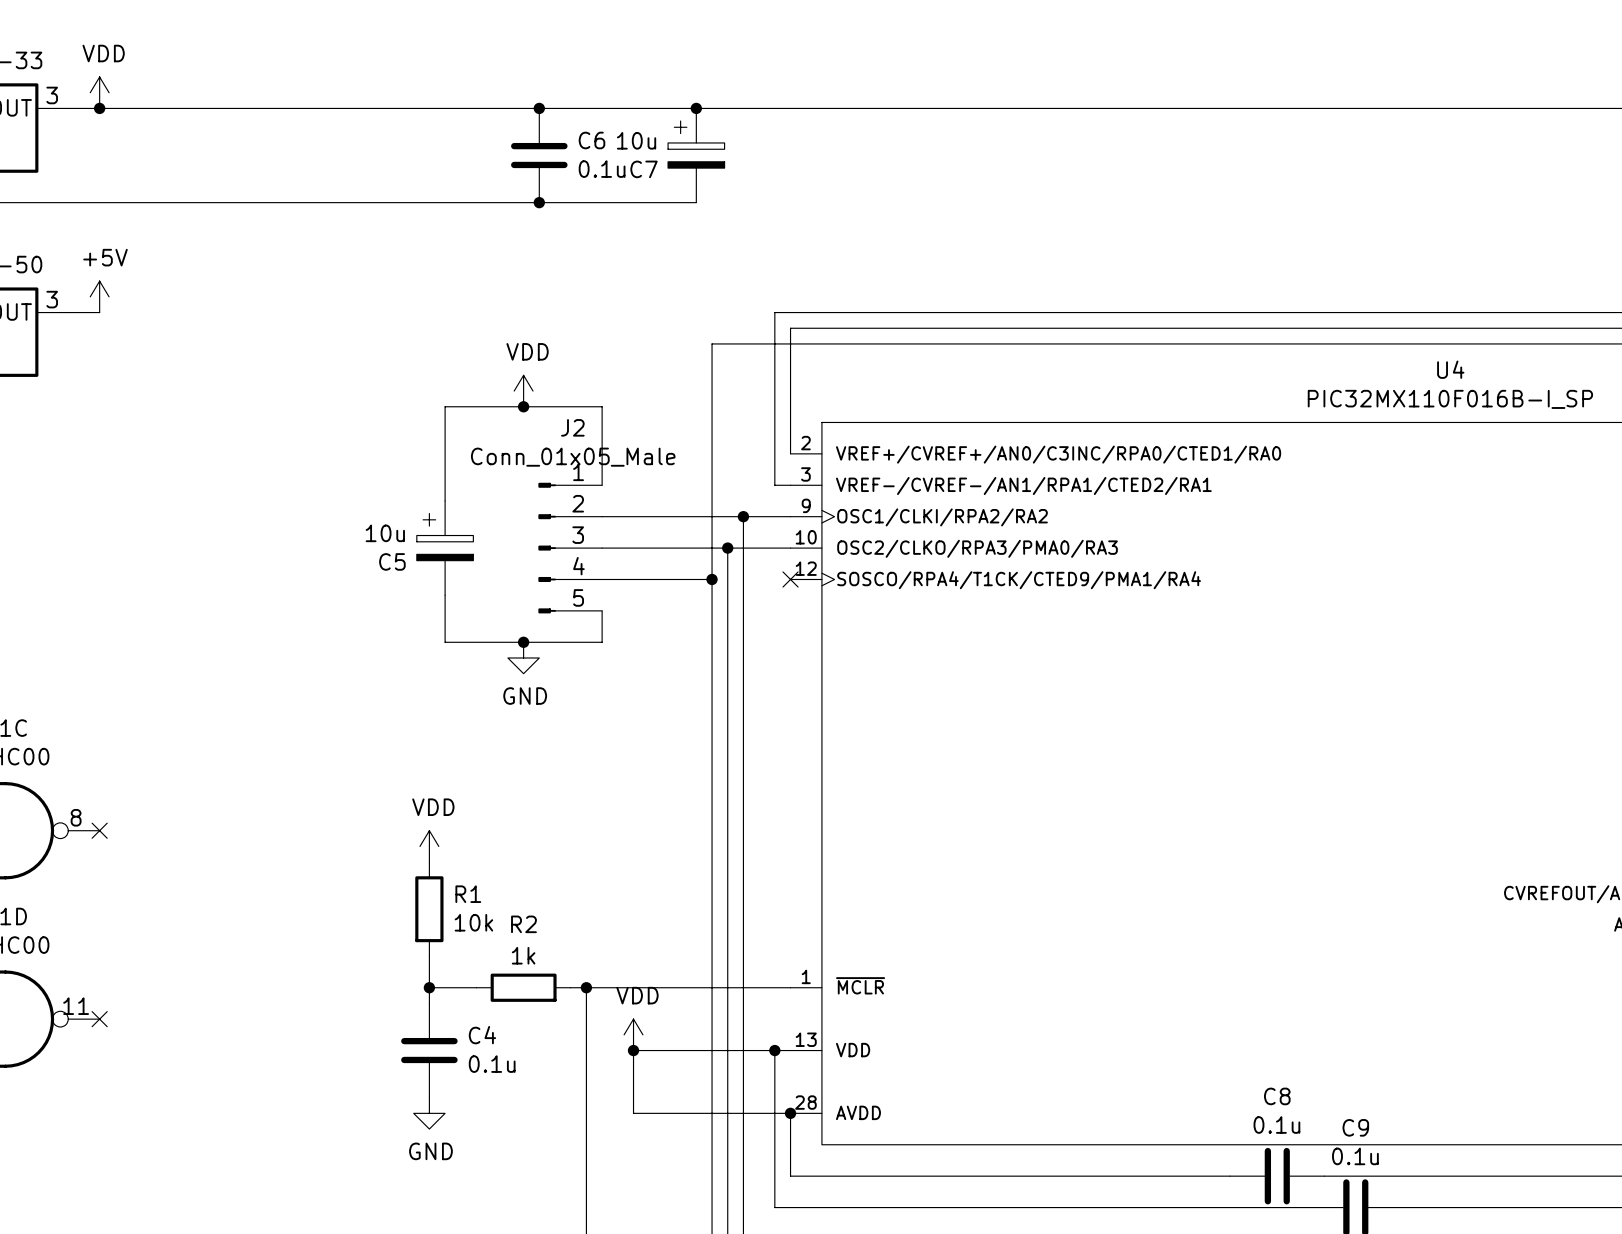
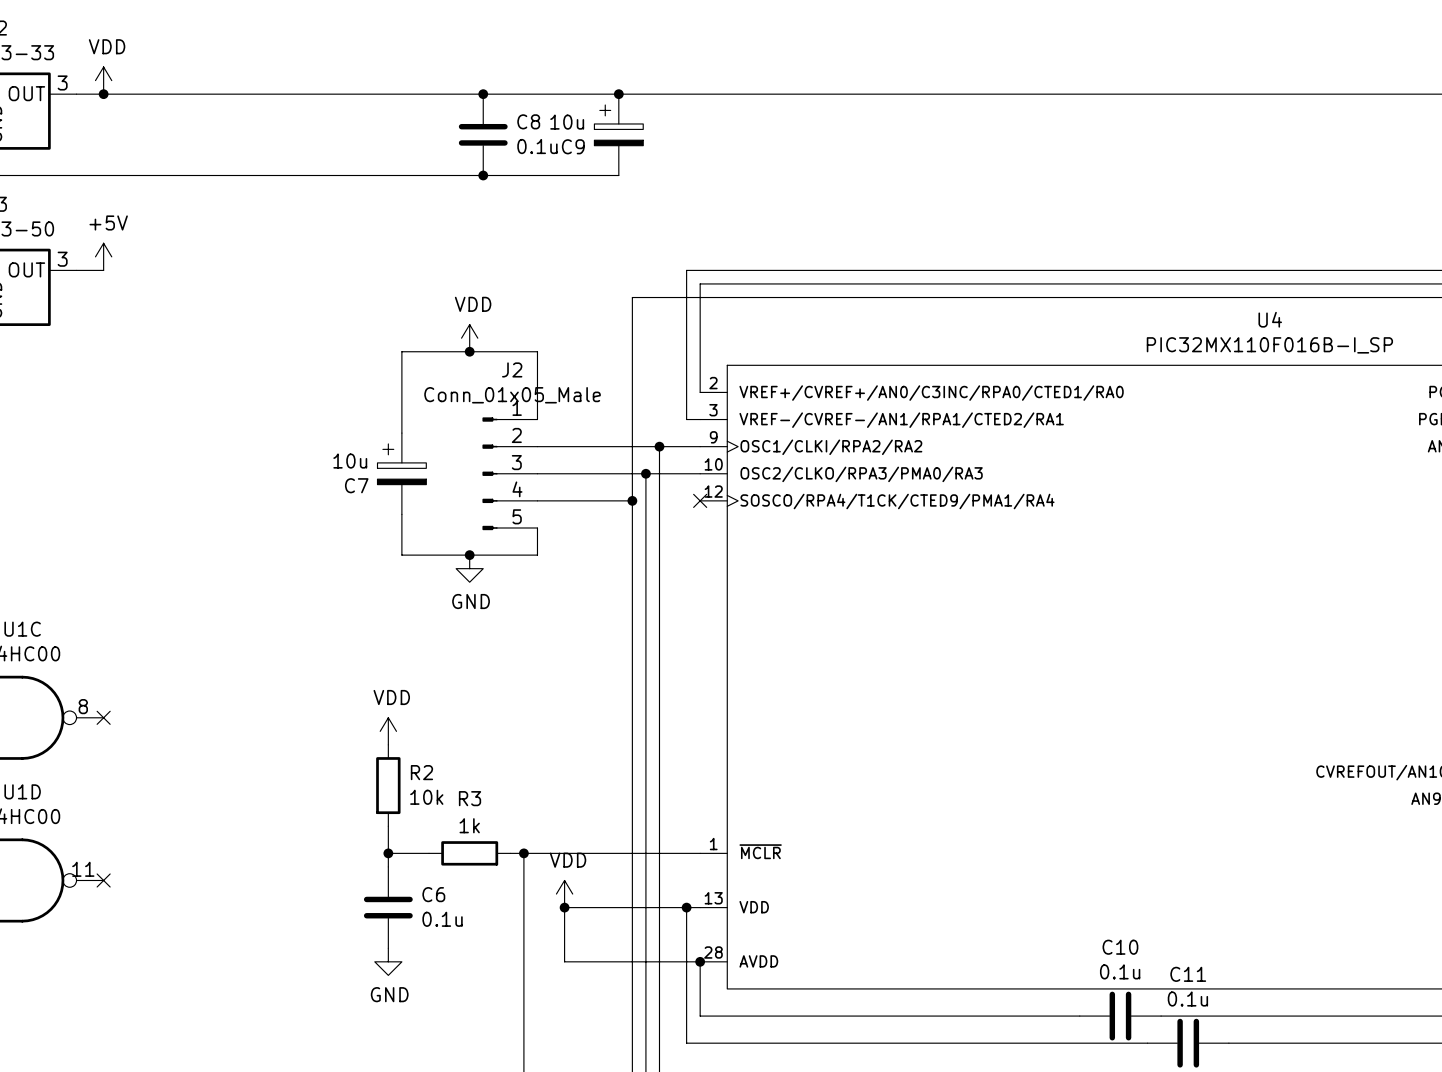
C6 name: C6 (591, 140) -> C8 (528, 121)
C7 name: C7 (644, 169) -> C9 (573, 146)
C5 name: C5 (392, 561) -> C7 (356, 485)
R1 name: R1 (468, 894) -> R2 (421, 772)
R2 name: R2 (523, 924) -> R3 (470, 798)
C4 name: C4 (482, 1035) -> C6 (433, 894)
C8 name: C8 (1277, 1096) -> C10 (1120, 947)
C9 name: C9 (1355, 1127) -> C11 (1188, 974)

